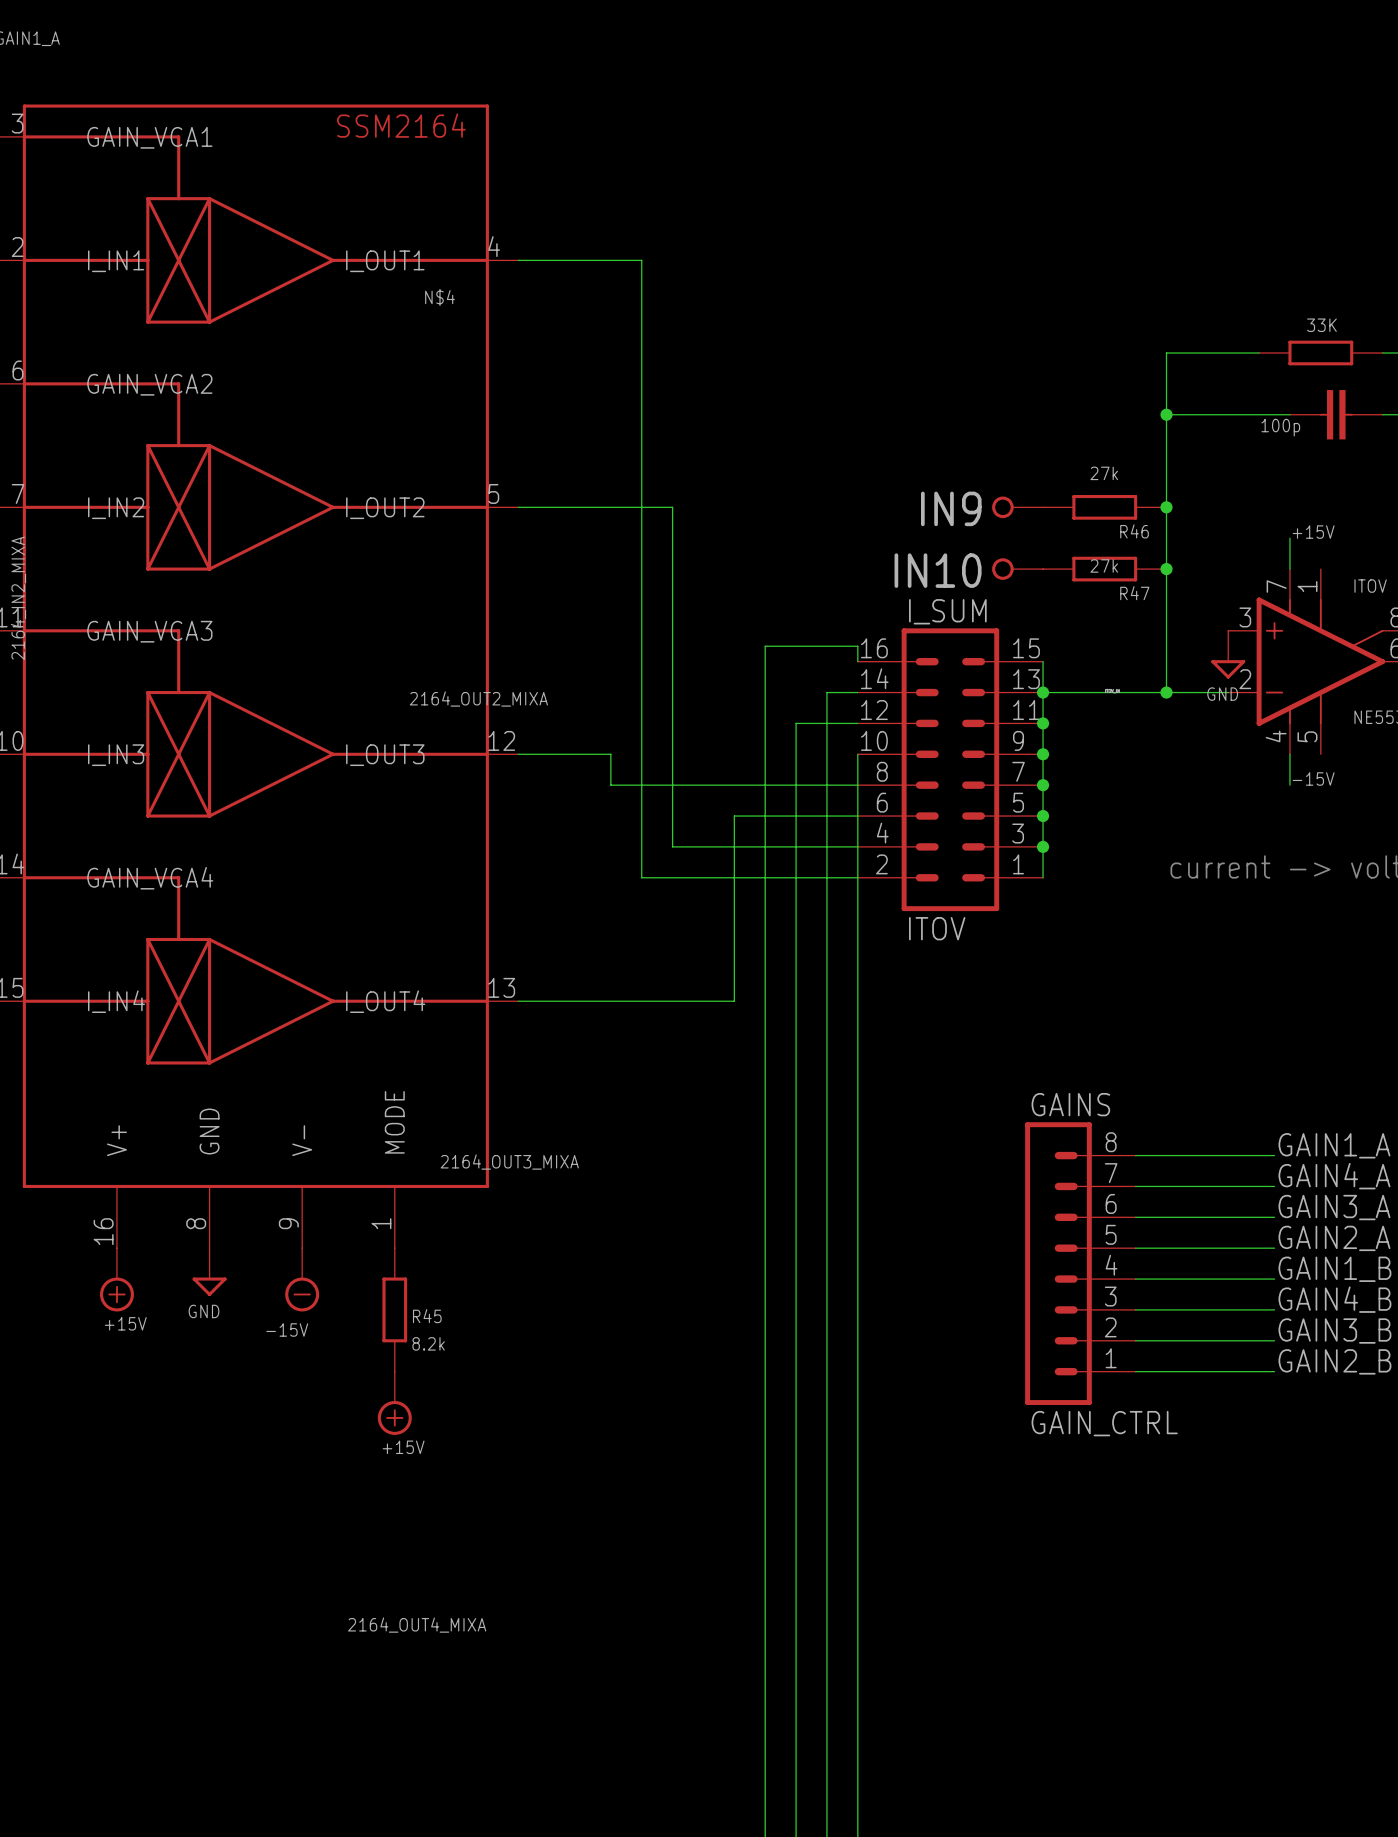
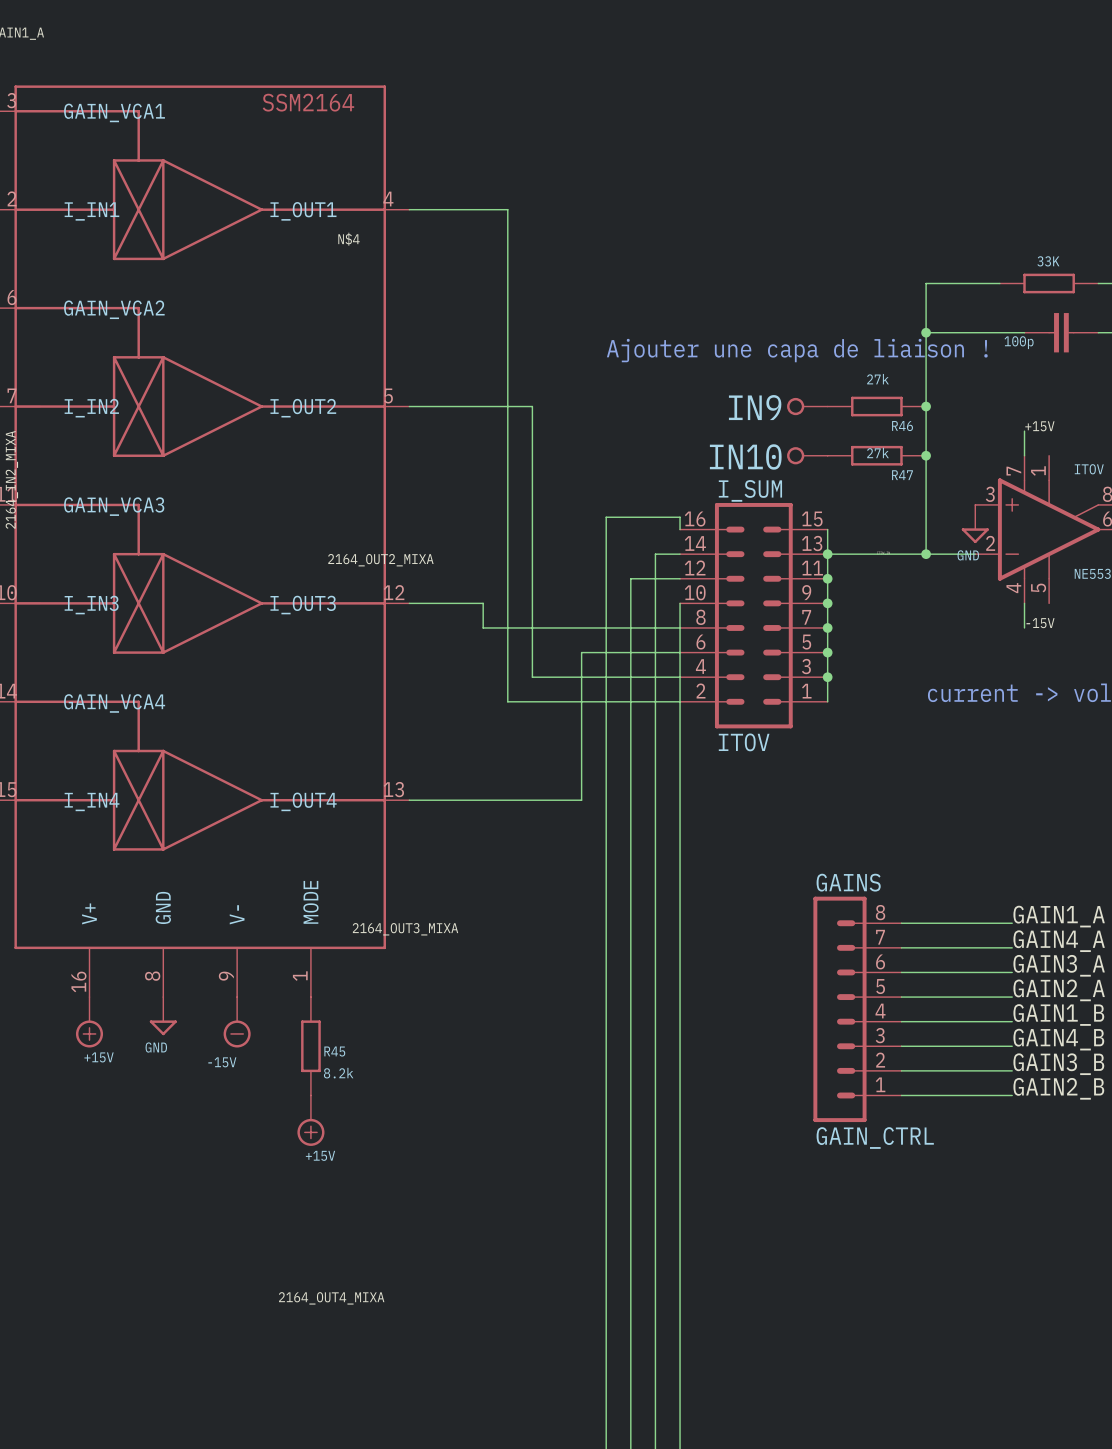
text: none -> Ajouter une capa de liaison ! (797, 350)

